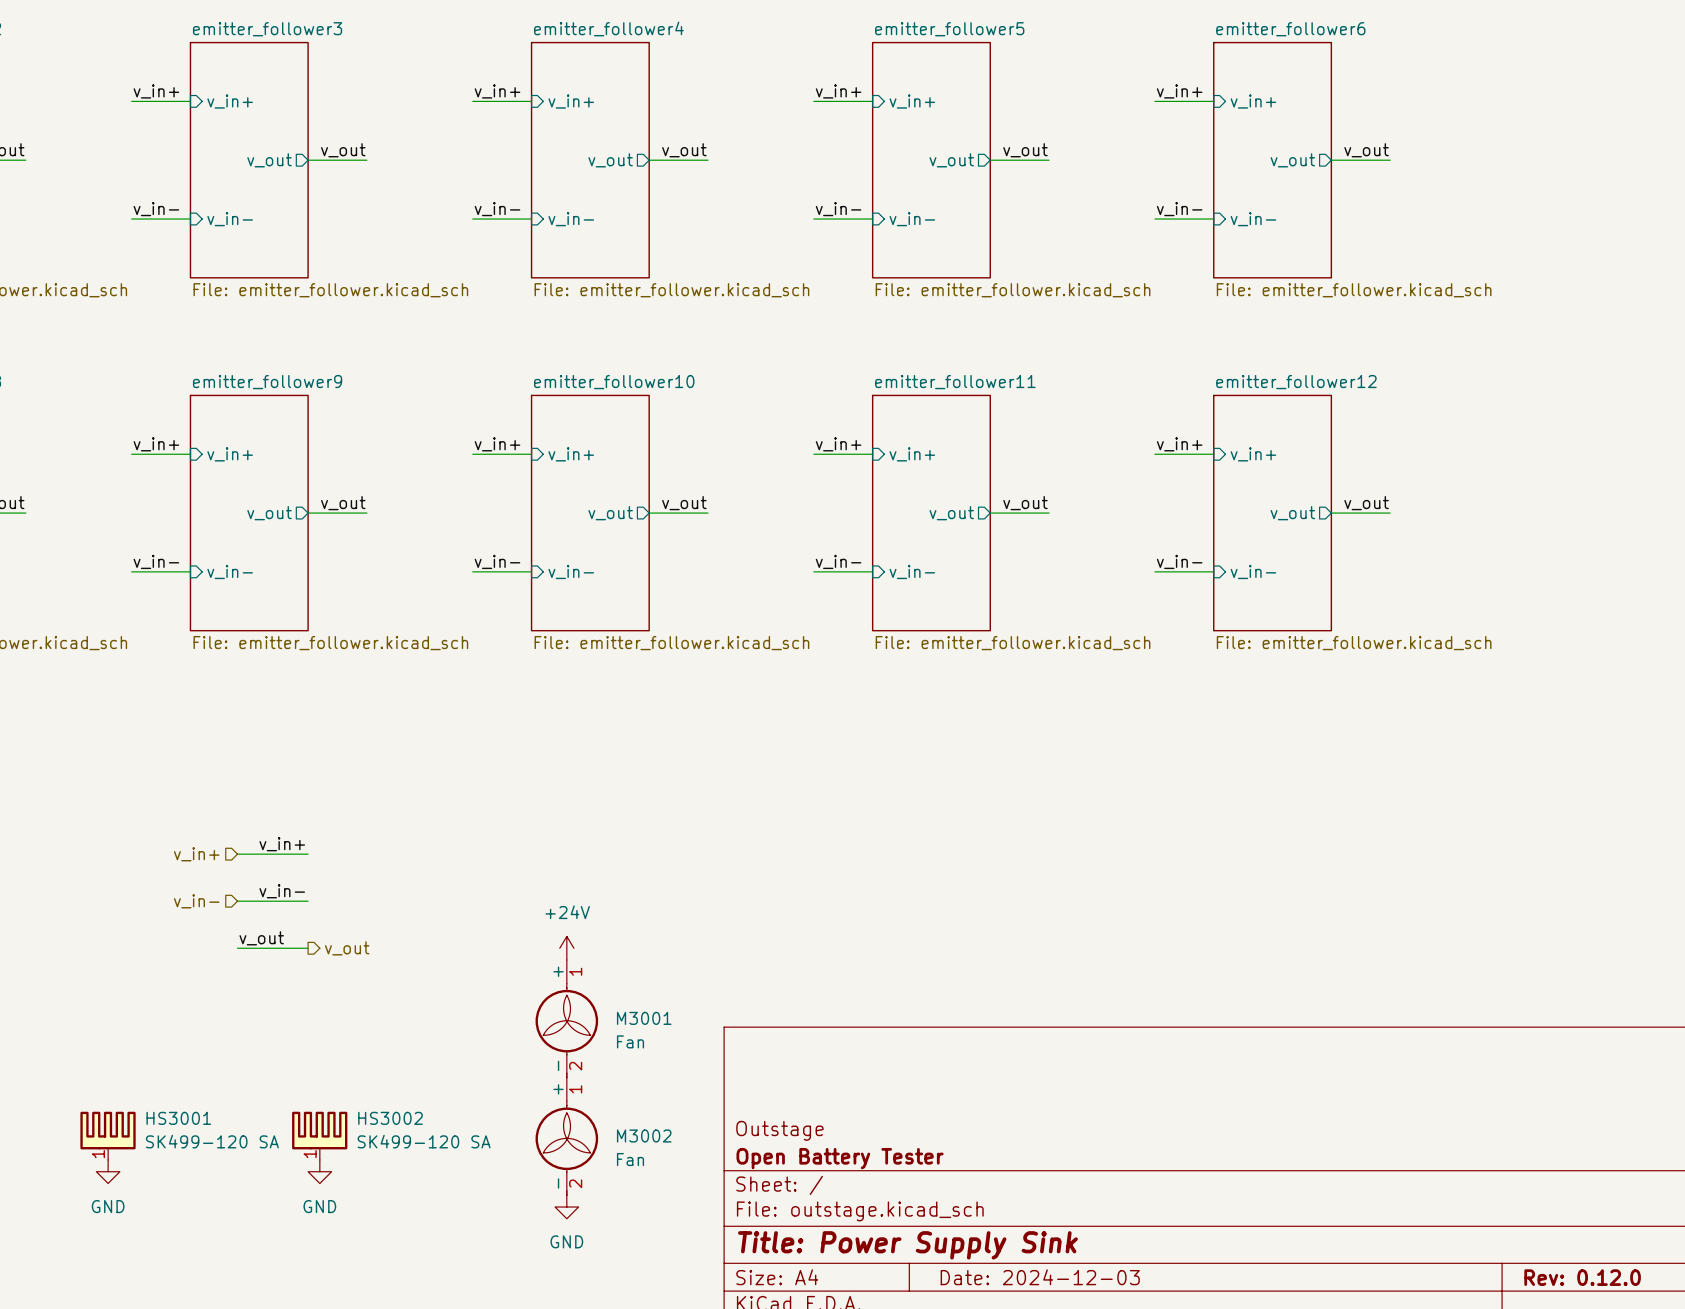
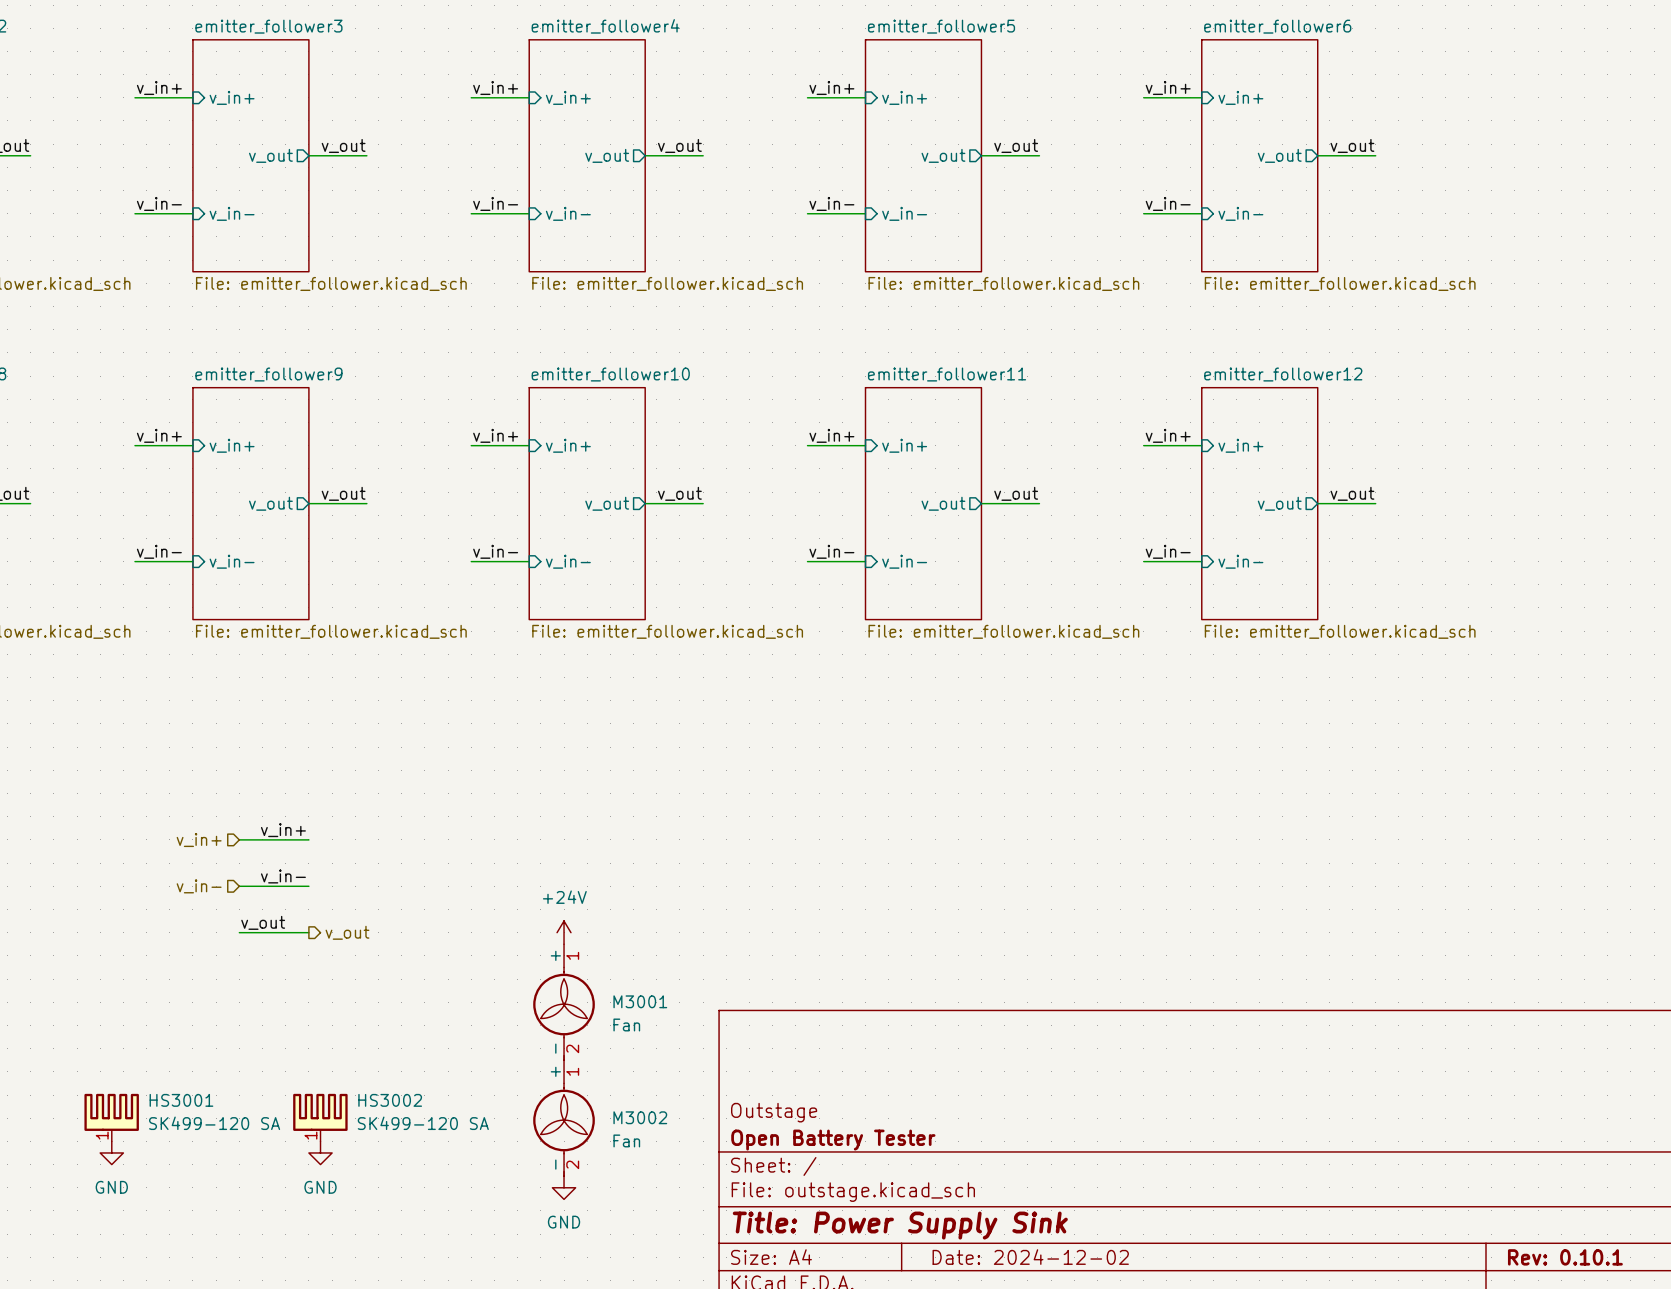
title block: Date: 2024-12-03 (1040, 1277) -> Date: 2024-12-02 (1030, 1257)
title block: Rev: 0.12.0 (1582, 1277) -> Rev: 0.10.1 (1565, 1257)

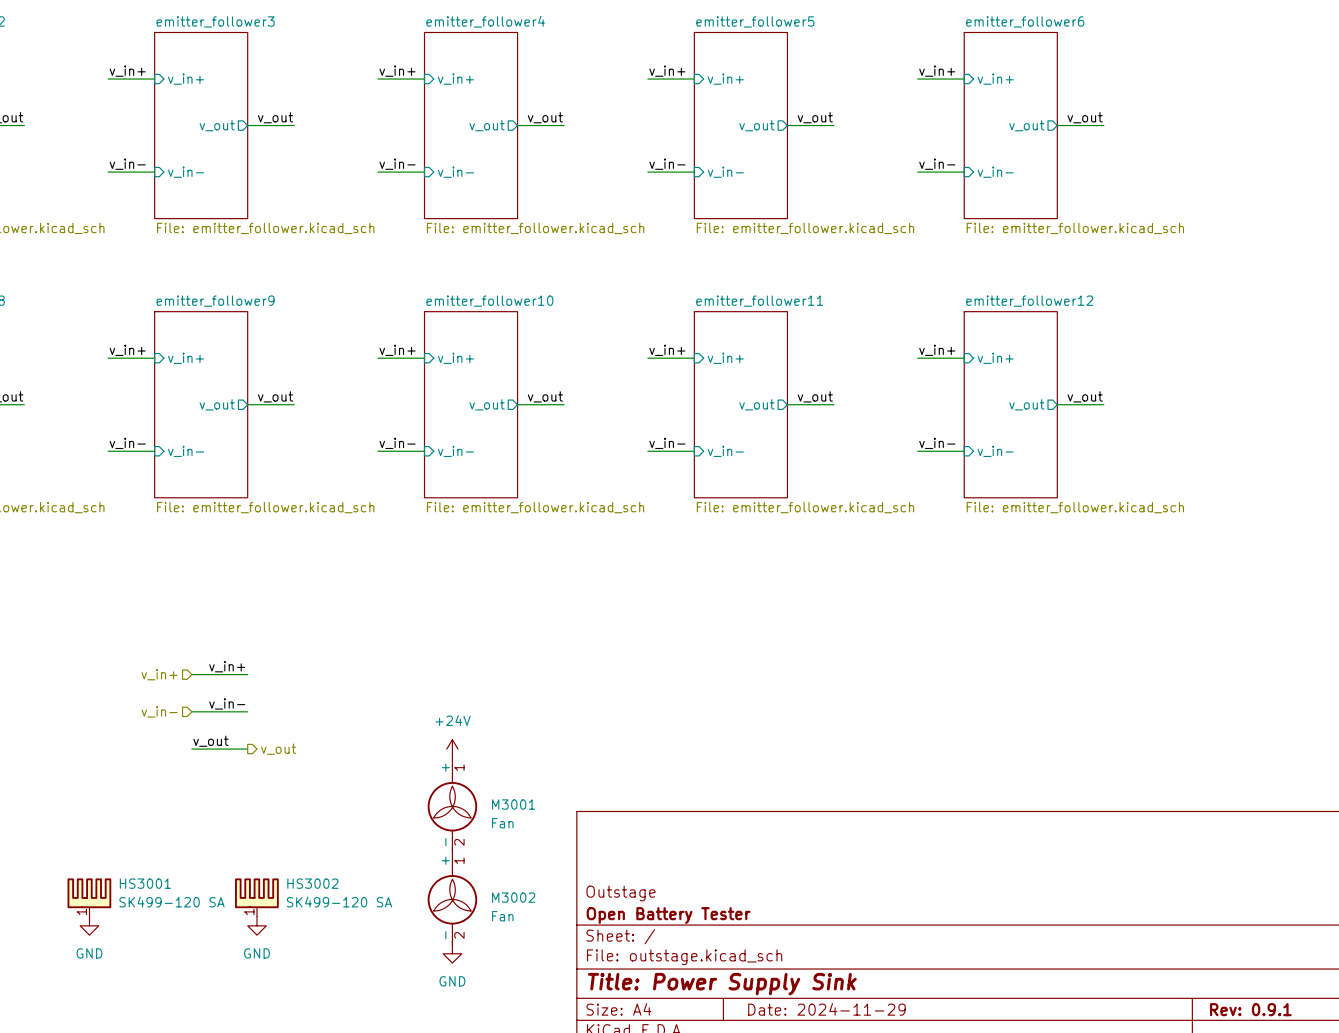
title block: Date: 2024-12-02 (1030, 1257) -> Date: 2024-11-29 (826, 1009)
title block: Rev: 0.10.1 (1565, 1257) -> Rev: 0.9.1 (1250, 1009)

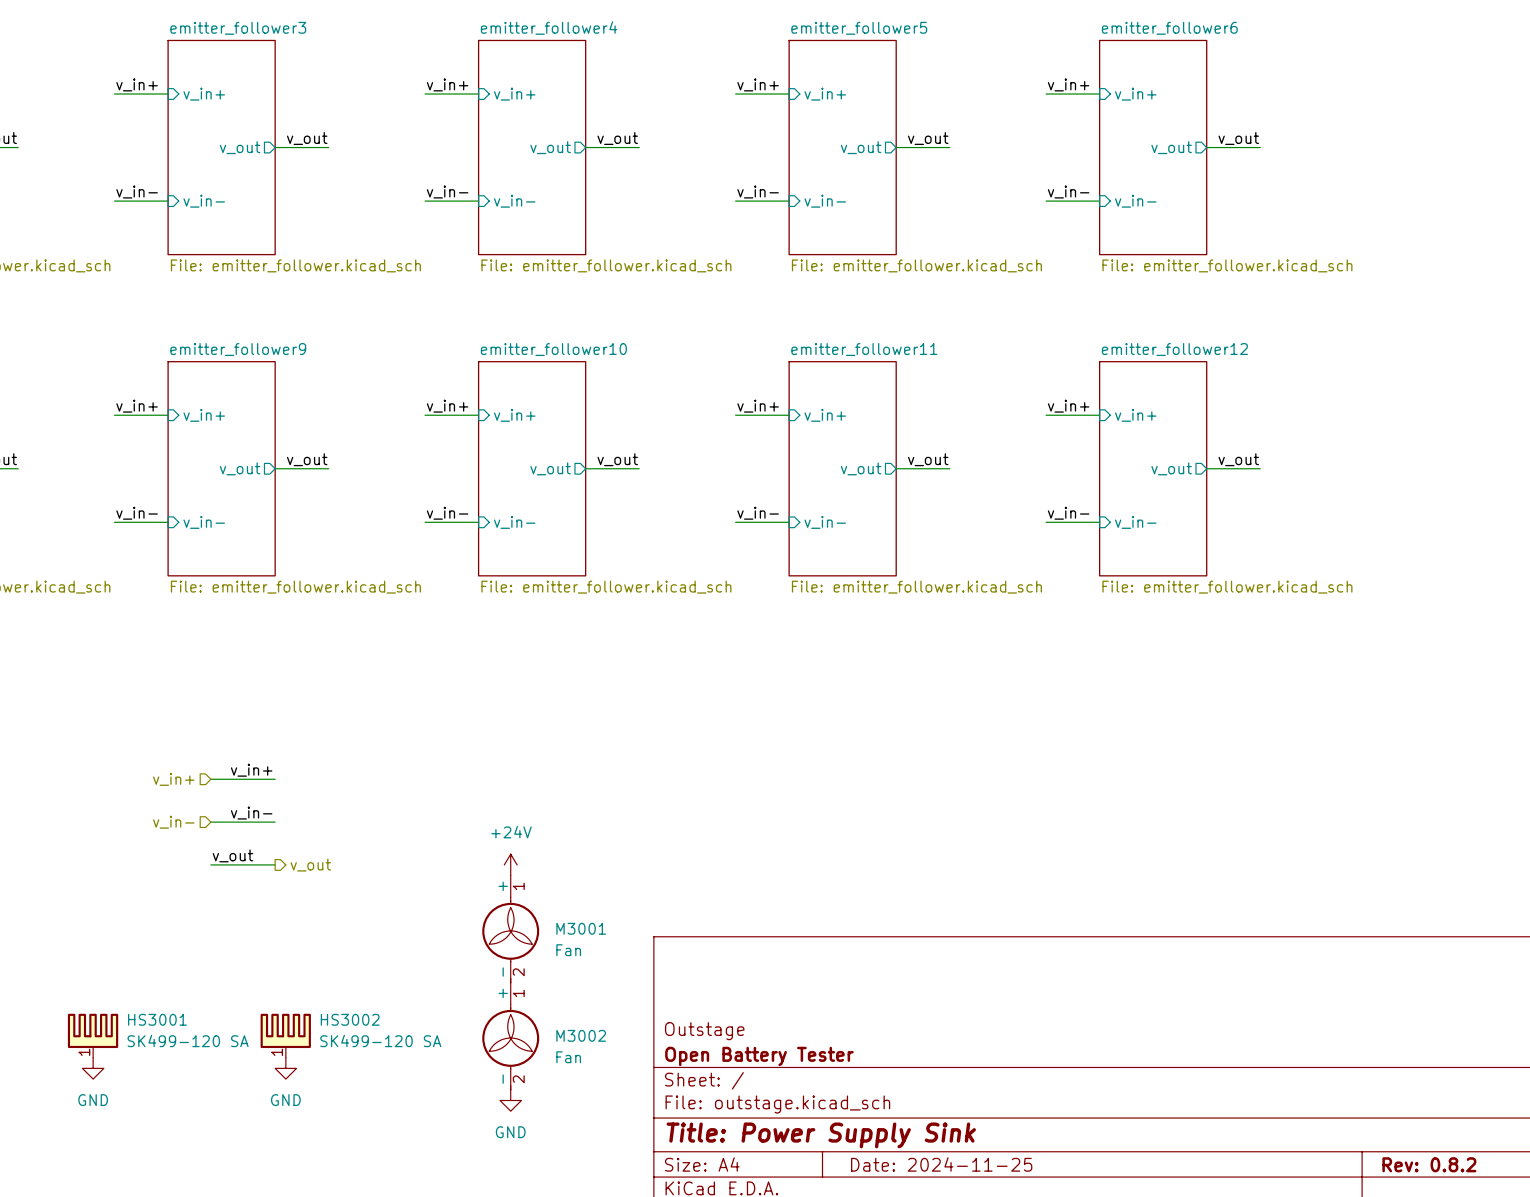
title block: Date: 2024-11-29 (826, 1009) -> Date: 2024-11-25 (941, 1164)
title block: Rev: 0.9.1 (1250, 1009) -> Rev: 0.8.2 (1429, 1164)

